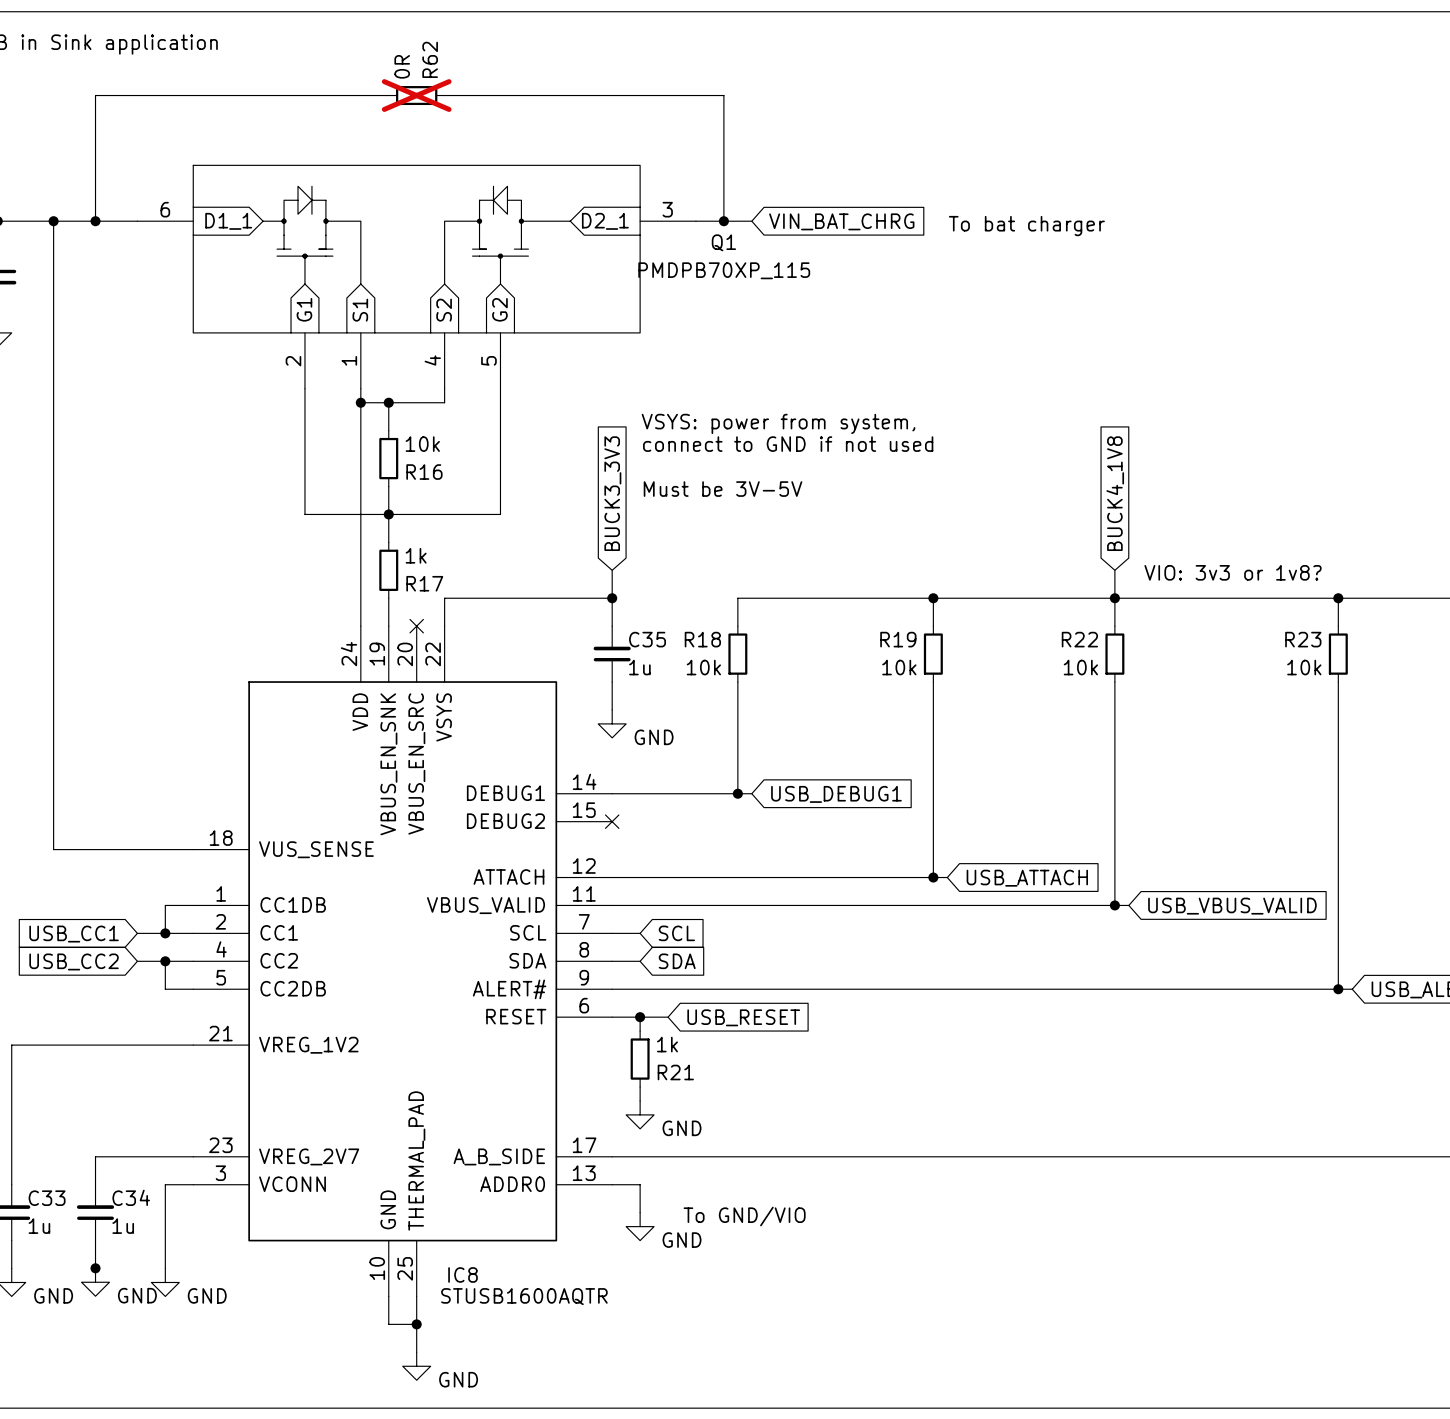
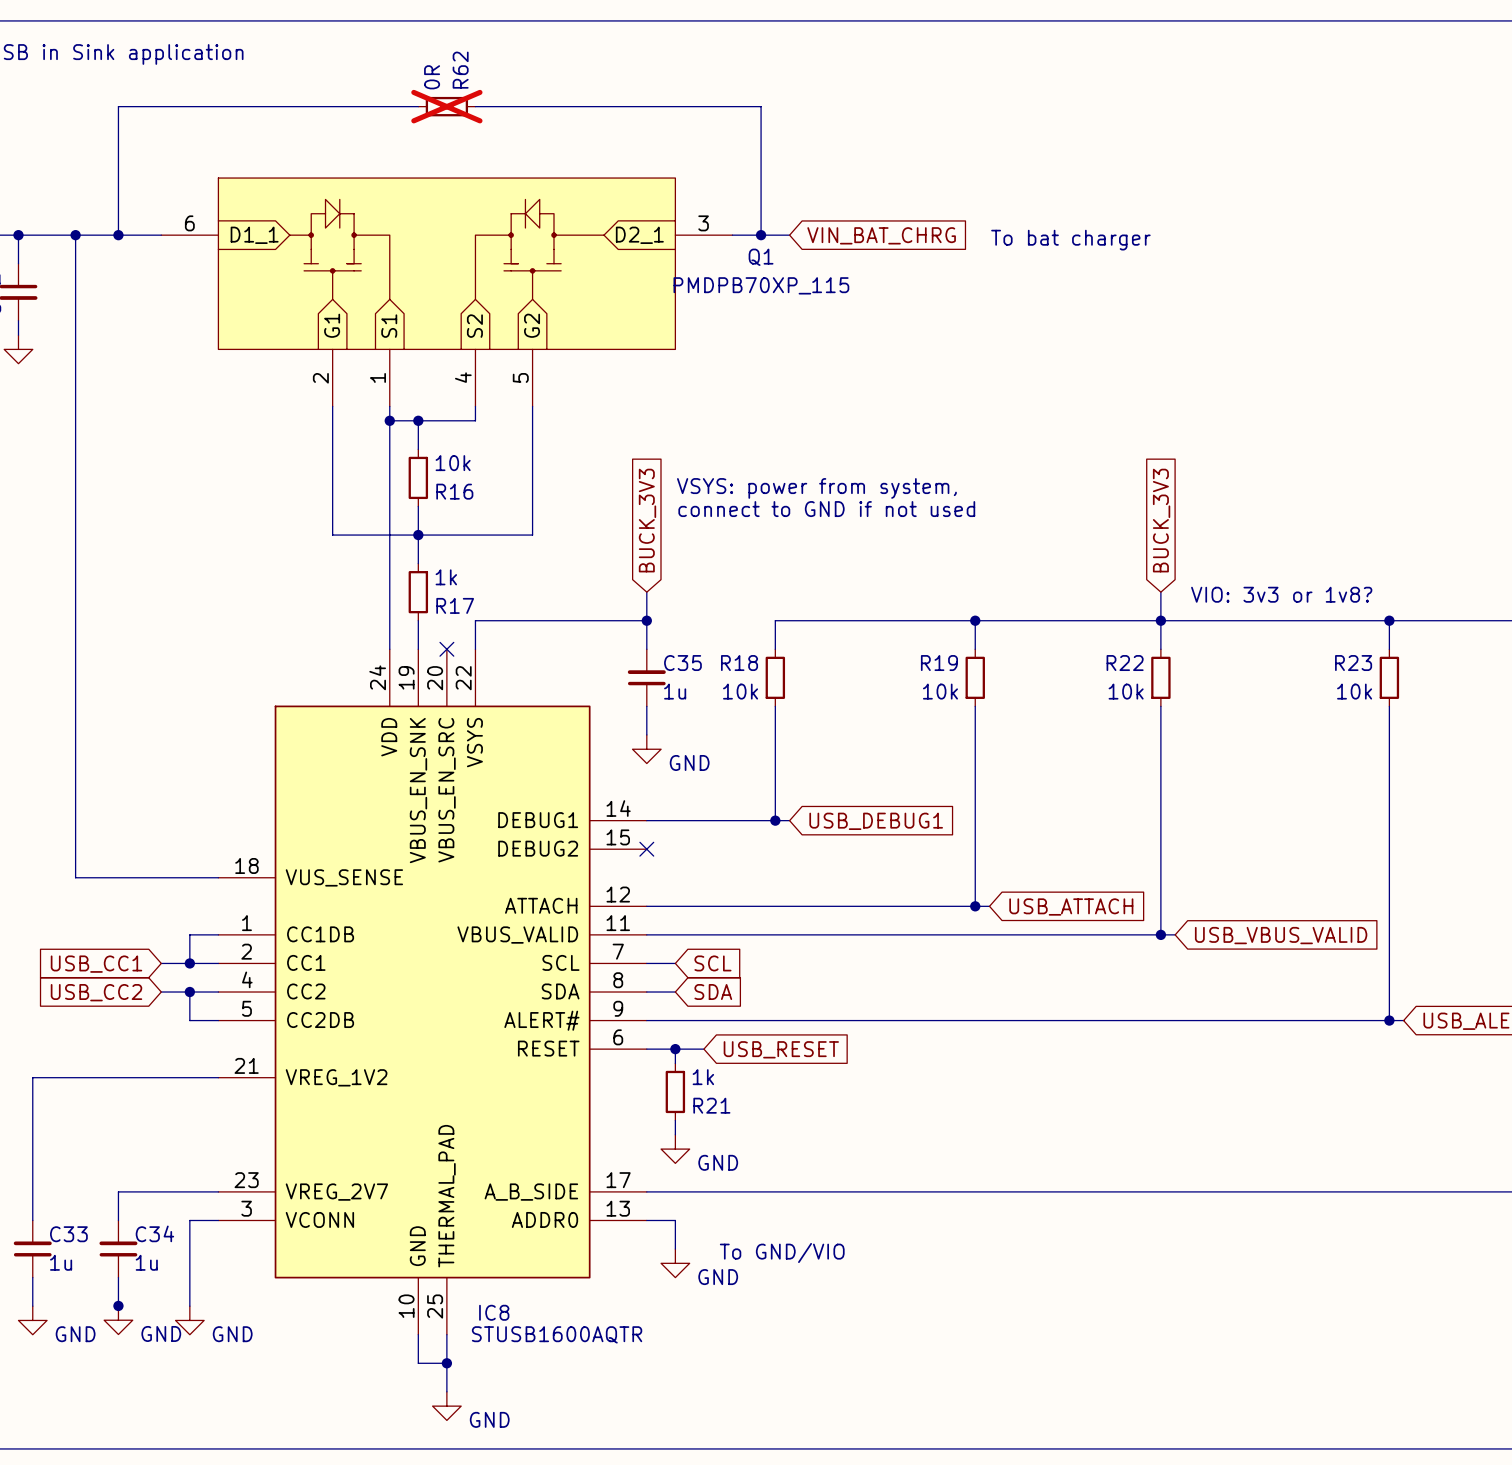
text position: VSYS: power from system, (778, 423) -> VSYS: power from system, (816, 488)
text: connect to GND if not used (788, 444) -> none
text: Must be 3V-5V (723, 489) -> connect to GND if not used (826, 509)
global label: BUCK3_3V3 (612, 493) -> BUCK_3V3 (647, 520)
global label: BUCK4_1V8 (1115, 493) -> BUCK_3V3 (1161, 520)

